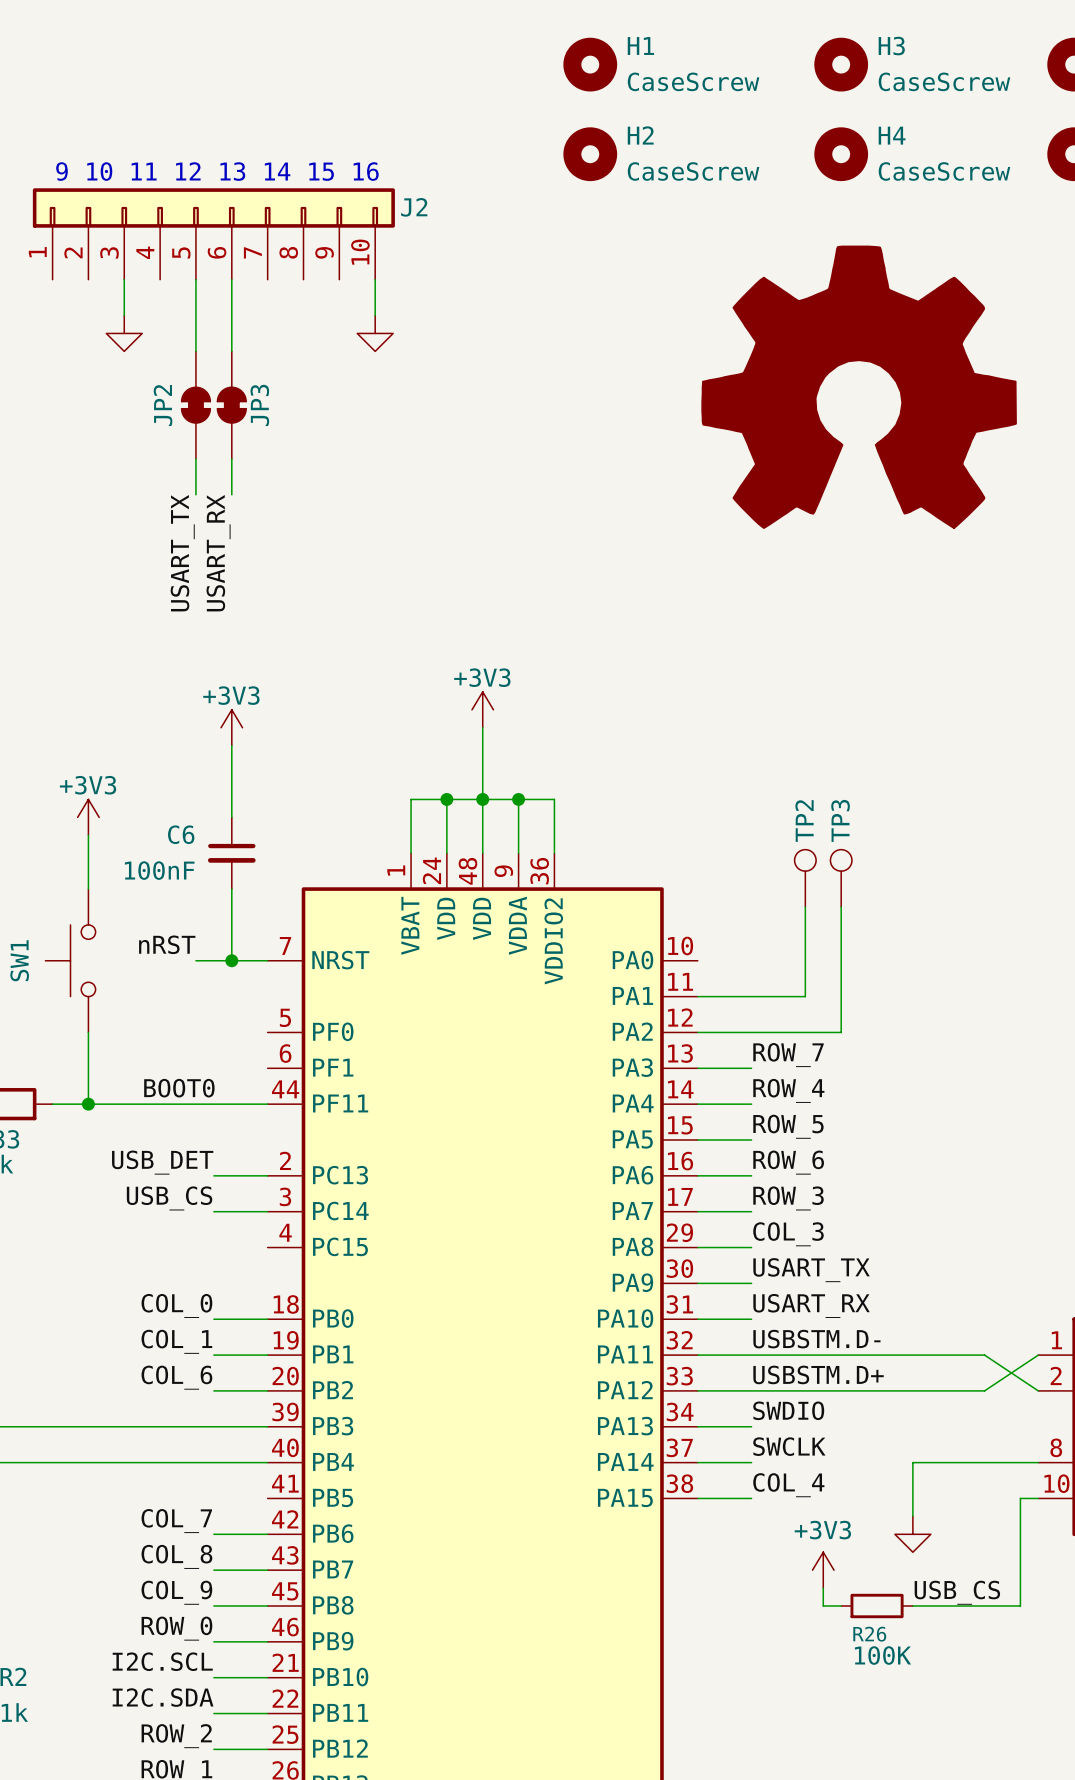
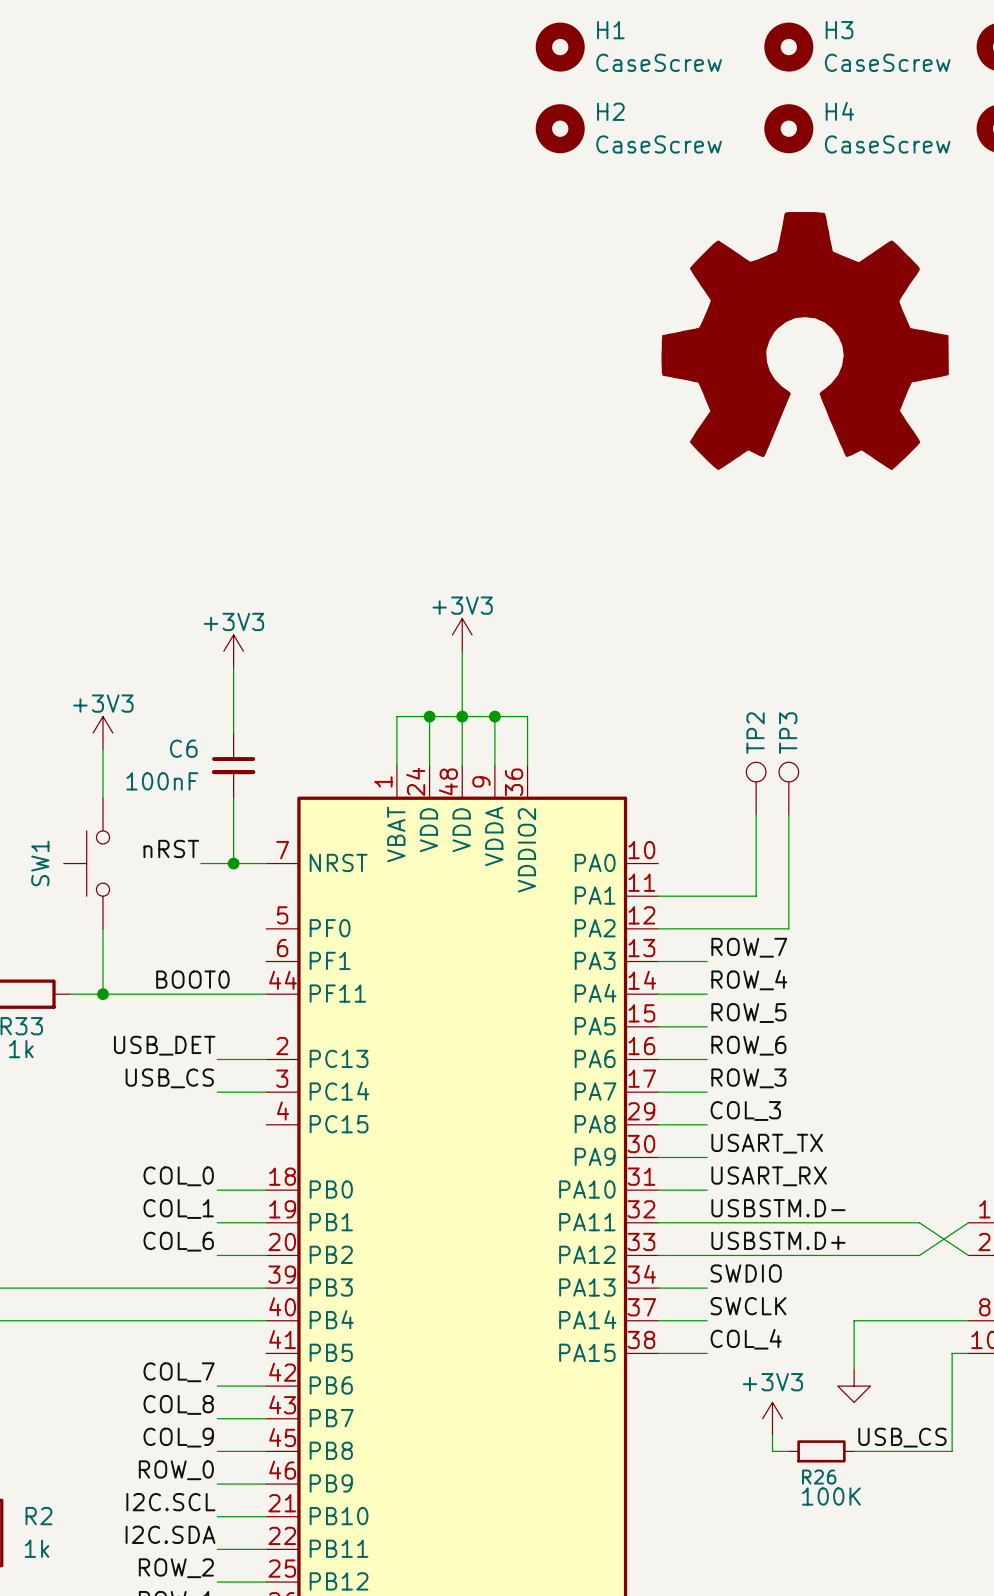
text: 9 10 11 12 13 14 15 16 (217, 171) -> none
J2: (213, 233) -> none
wire: (124, 279) (124, 315) -> none
wire: (195, 279) (195, 351) -> none
wire: (231, 279) (231, 351) -> none
wire: (375, 279) (375, 315) -> none
power symbol: (124, 333) -> none
power symbol: (375, 333) -> none
JP2: (195, 405) -> none
JP3: (231, 405) -> none
wire: (195, 458) (195, 494) -> none
wire: (231, 458) (231, 494) -> none
label: USART_TX (182, 553) -> none
label: USART_RX (218, 553) -> none

